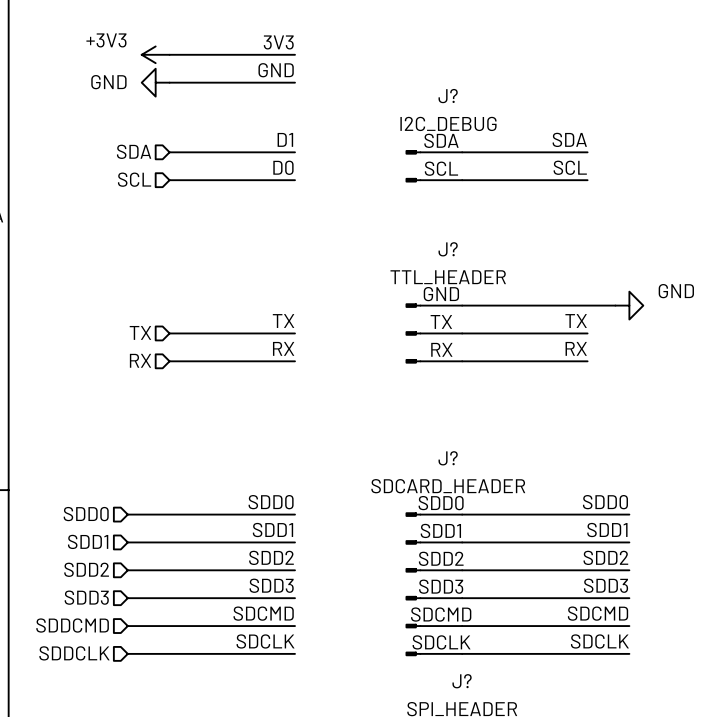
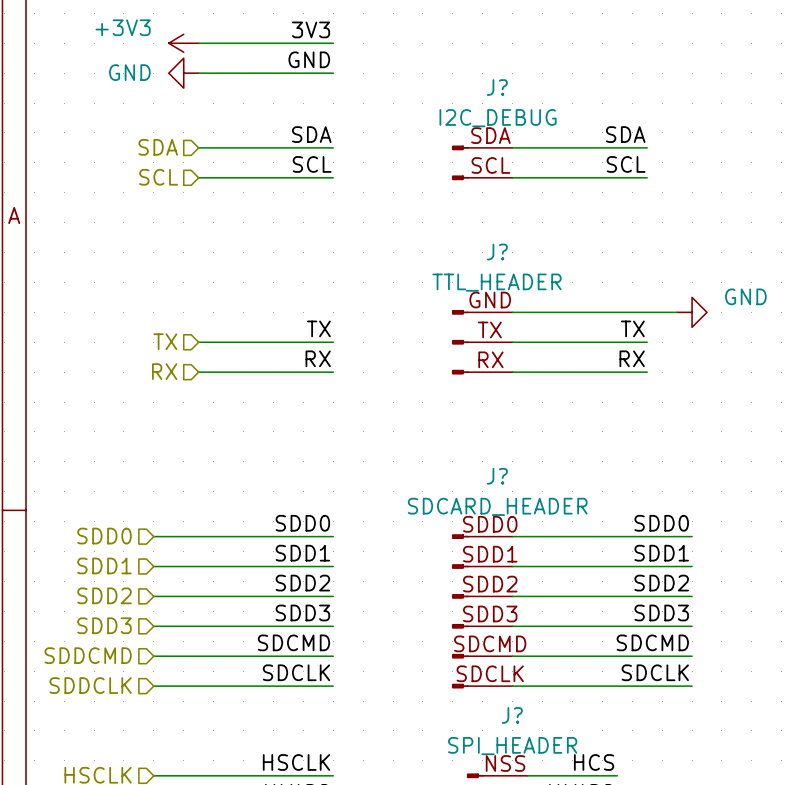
label: D1 (285, 139) -> SDA (311, 134)
label: D0 (283, 167) -> SCL (312, 164)

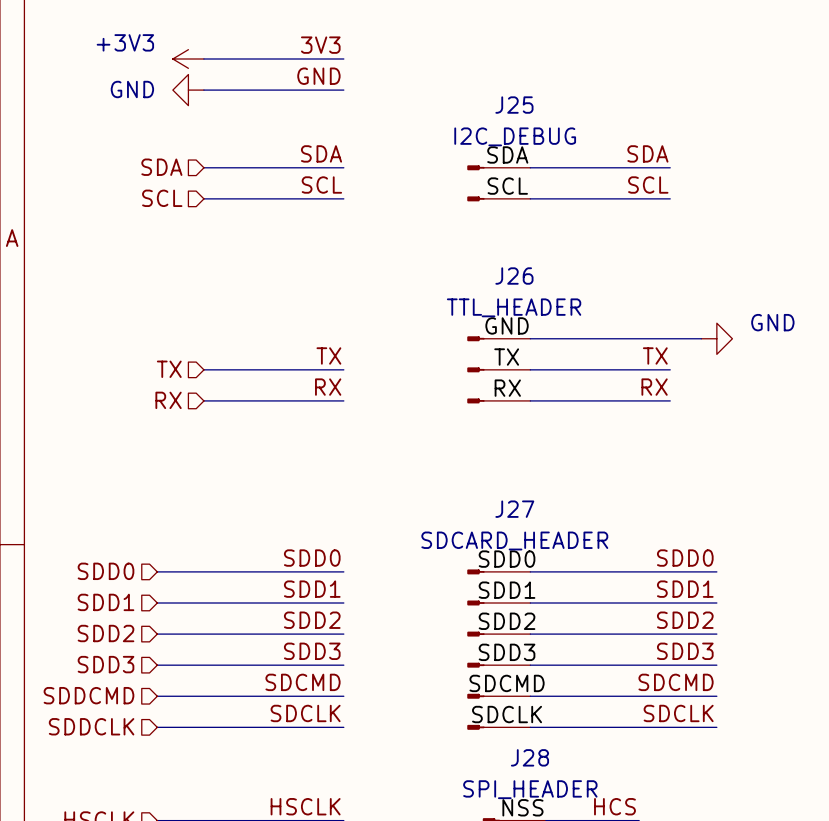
J? name: J? (497, 87) -> J25 (514, 105)
J? name: J? (497, 252) -> J26 (514, 276)
J? name: J? (497, 476) -> J27 (514, 509)
J? name: J? (512, 715) -> J28 (529, 757)

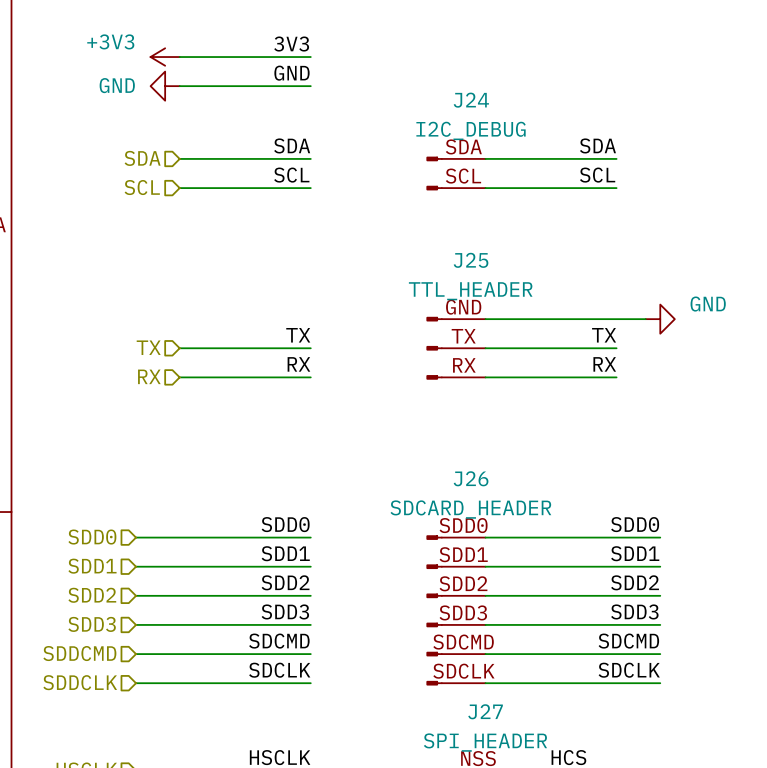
J25 name: J25 (514, 105) -> J24 (471, 100)
J26 name: J26 (514, 276) -> J25 (471, 260)
J27 name: J27 (514, 509) -> J26 (471, 478)
J28 name: J28 (529, 757) -> J27 (485, 711)

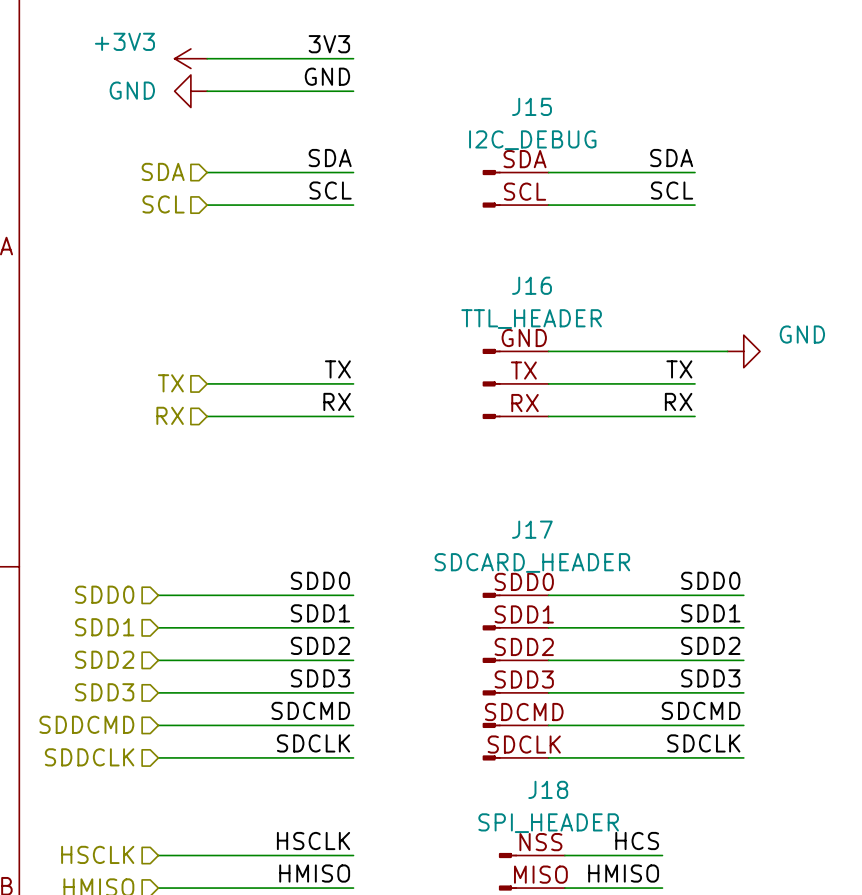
J24 name: J24 (471, 100) -> J15 (532, 106)
J25 name: J25 (471, 260) -> J16 (532, 285)
J26 name: J26 (471, 478) -> J17 (532, 529)
J27 name: J27 (485, 711) -> J18 (548, 789)

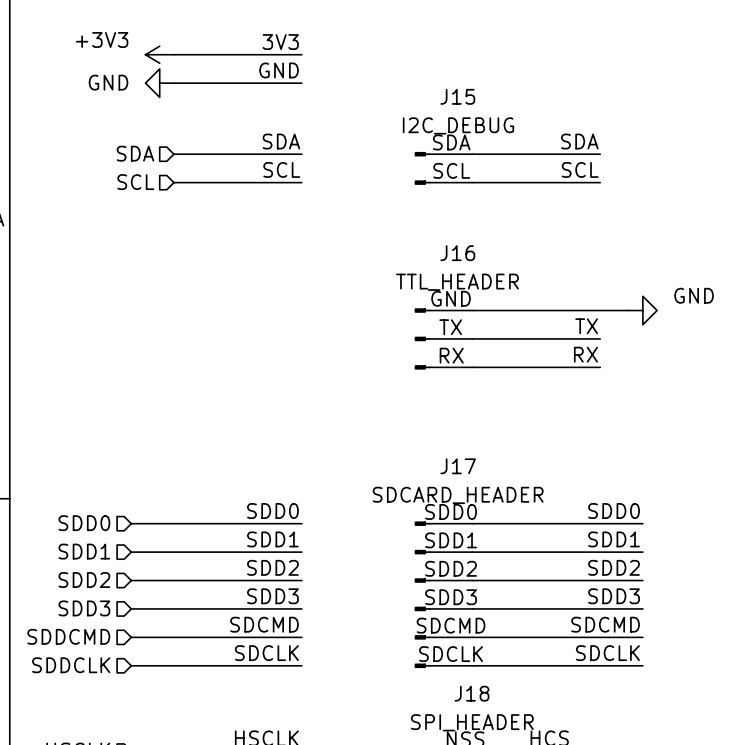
label: TX (337, 369) -> none
hierarchical label: TX (170, 383) -> none
wire: (207, 383) (353, 383) -> none
label: RX (337, 401) -> none
hierarchical label: RX (170, 415) -> none
wire: (207, 416) (353, 416) -> none

